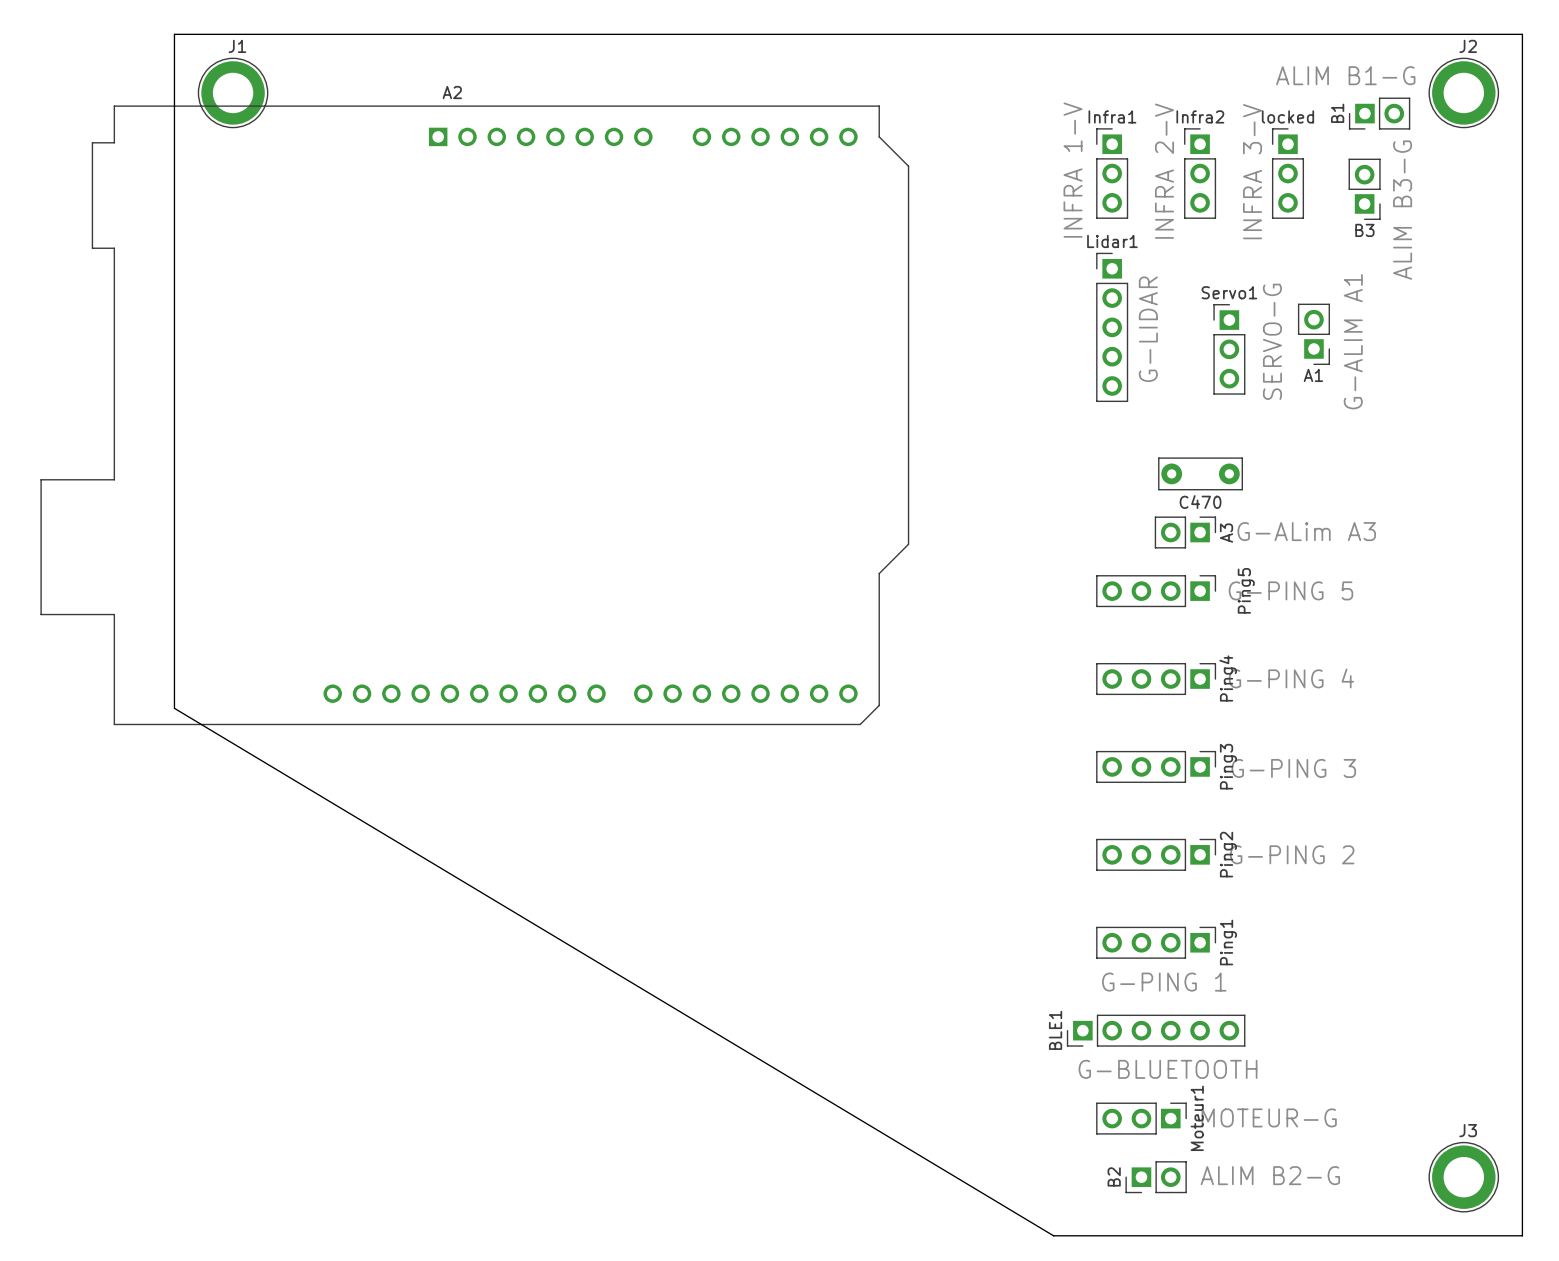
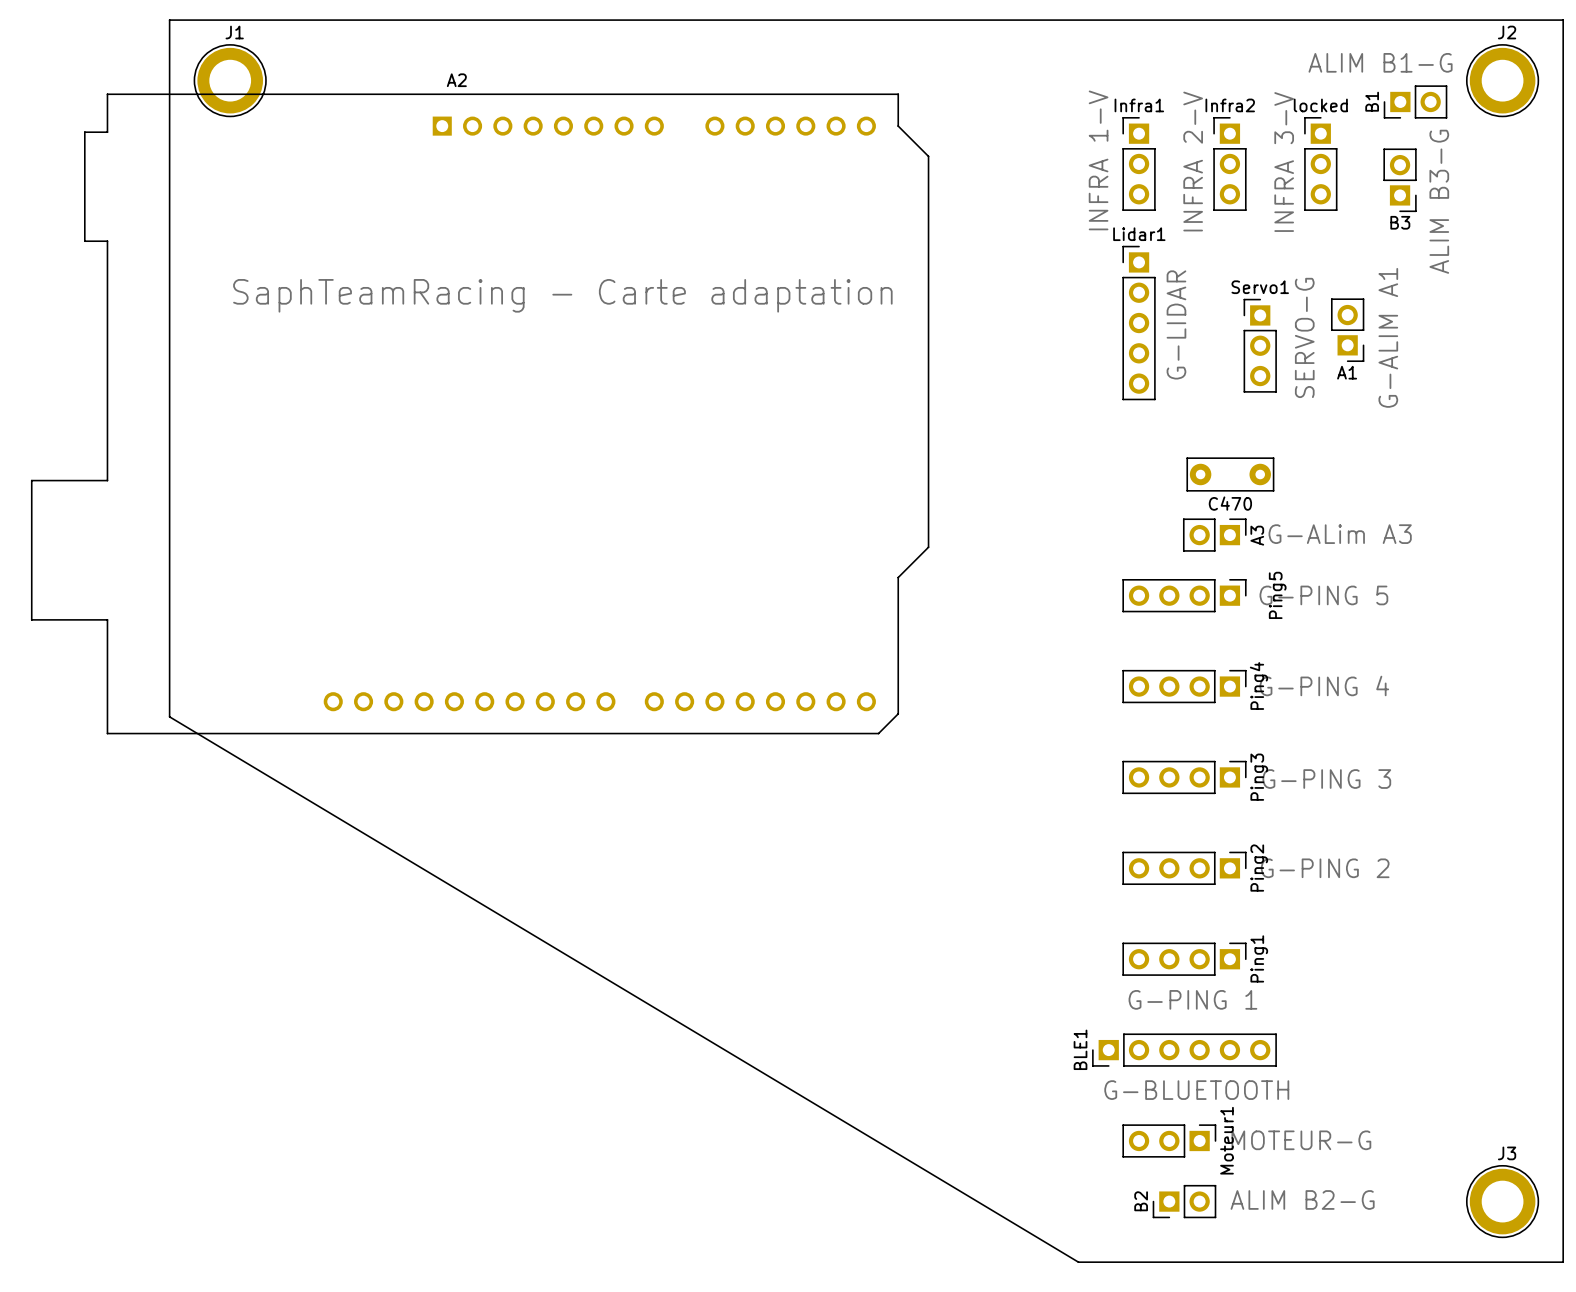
text: none -> SaphTeamRacing - Carte adaptation (562, 295)

